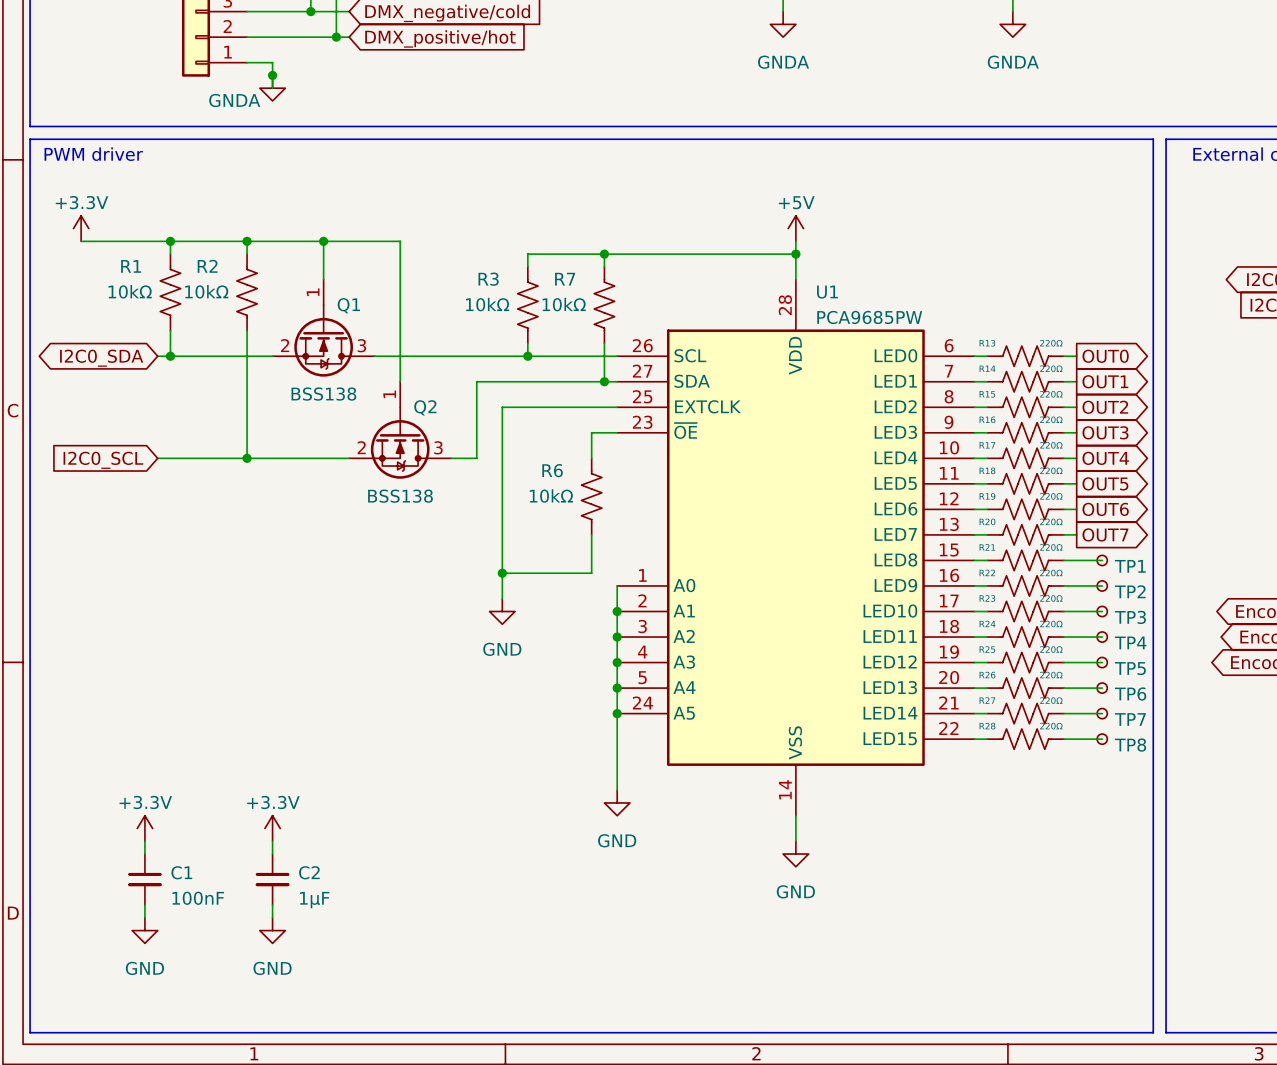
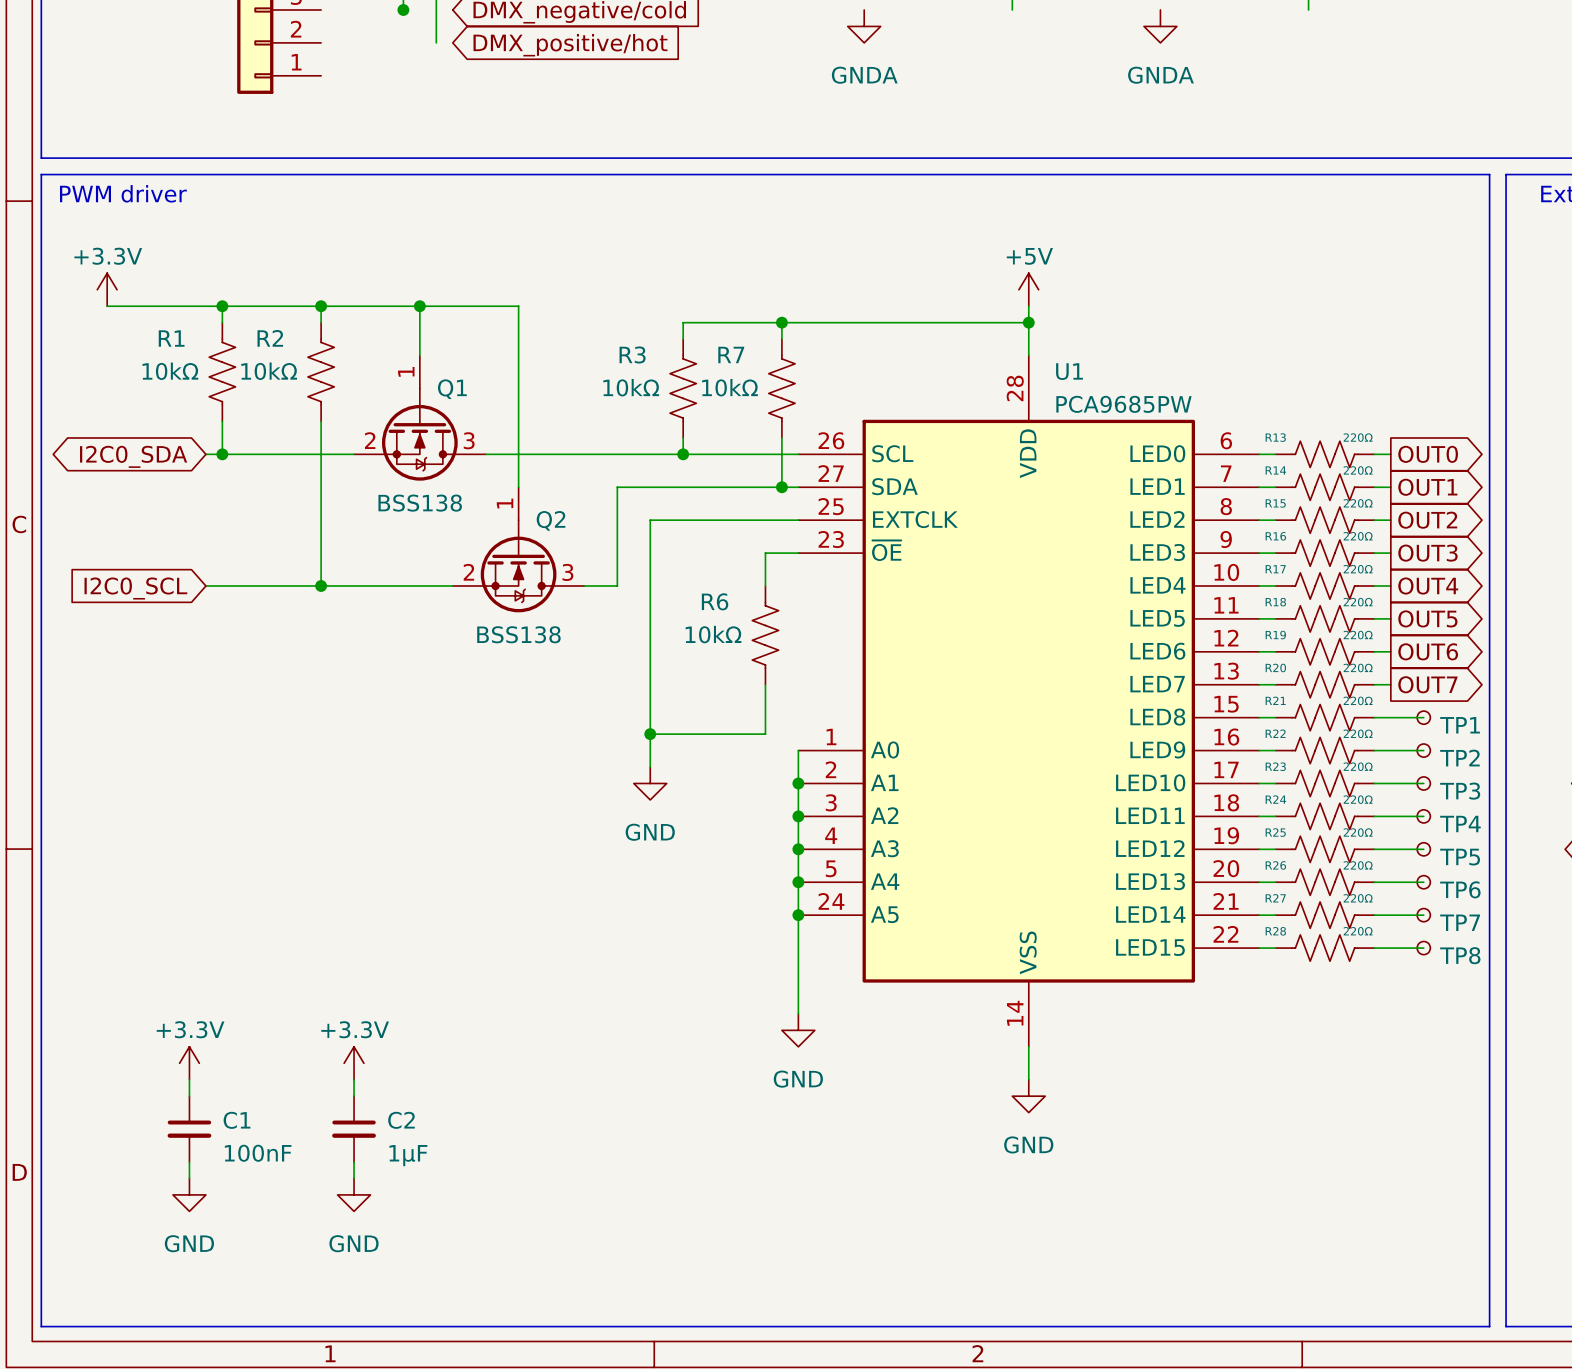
wire: (247, 11) (349, 11) -> none
power symbol: none -> GNDA (864, 26)
power symbol: GNDA (783, 24) -> none
power symbol: none -> GNDA (1160, 26)
power symbol: GNDA (1012, 24) -> none
wire: (247, 37) (349, 37) -> none
junction: (336, 37) -> none
wire: (247, 62) (272, 62) (272, 88) -> none
junction: (272, 75) -> none
power symbol: GNDA (272, 88) -> none

